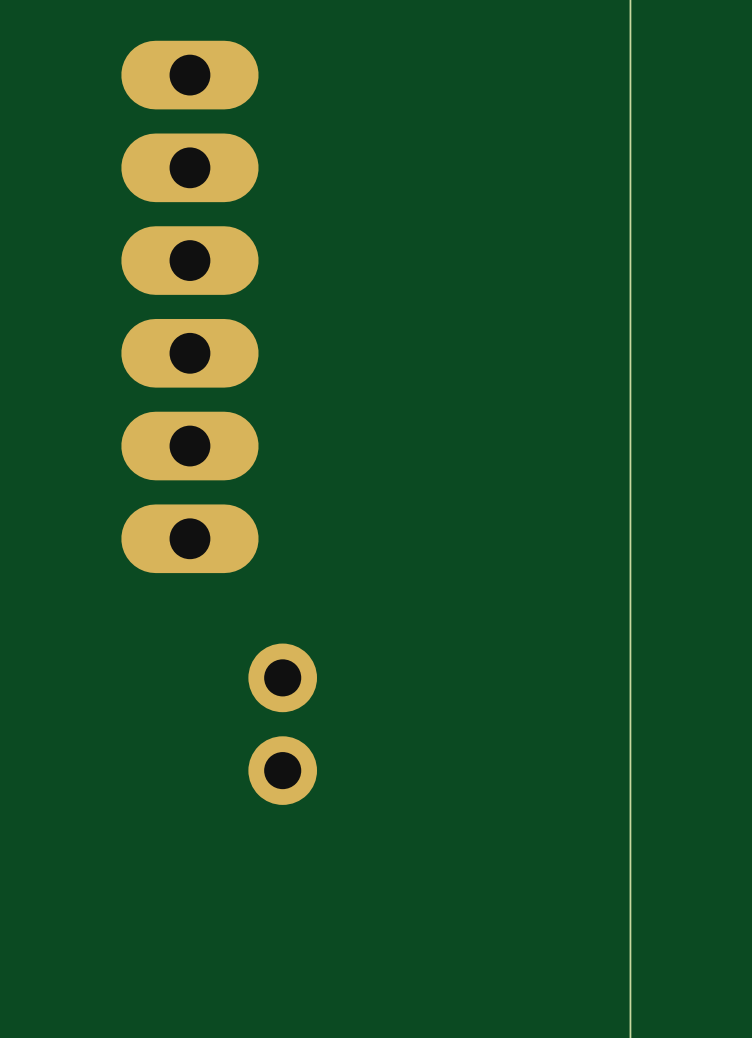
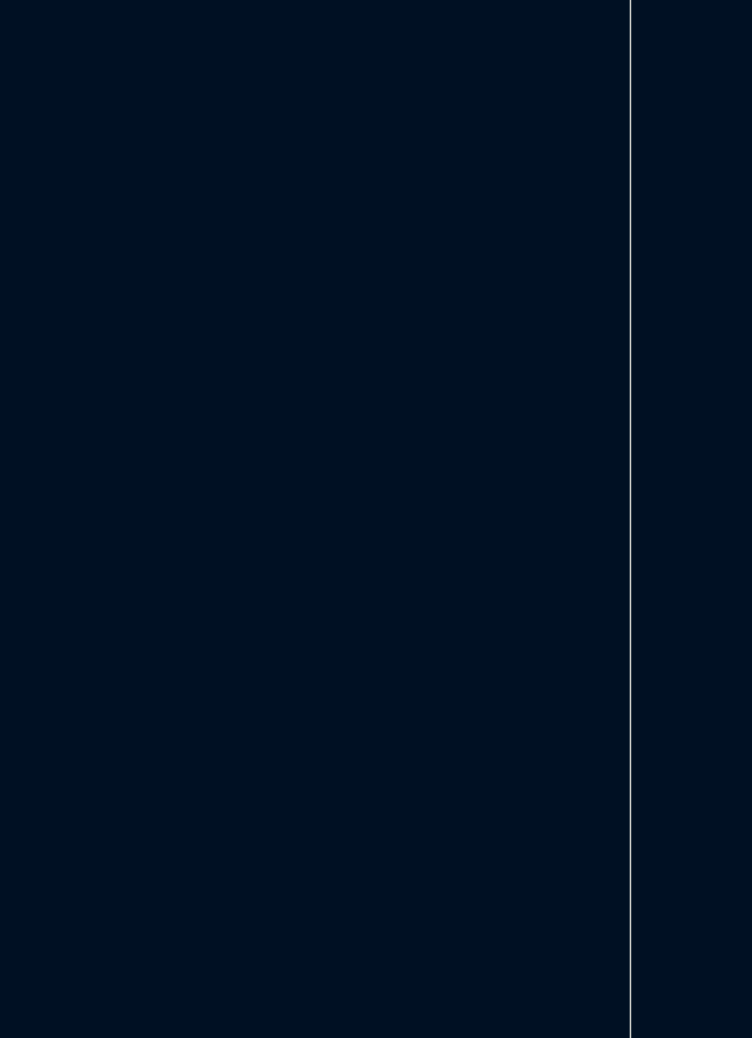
part: (189, 306) -> none
part: (282, 724) -> none

